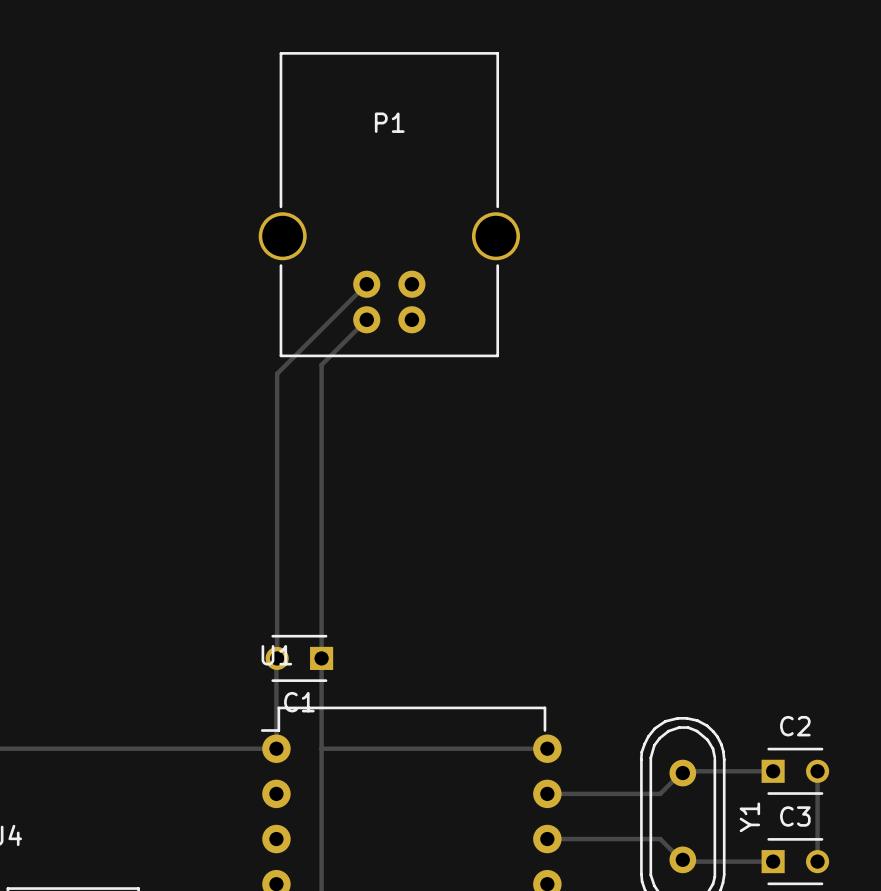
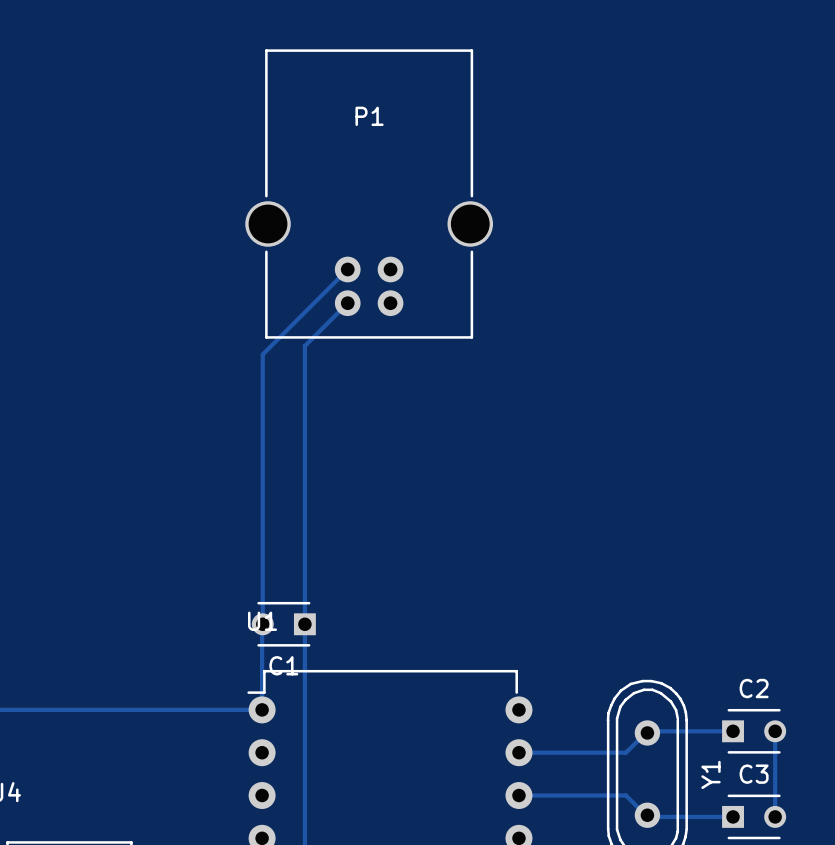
track: (321, 748) (547, 748) -> none

